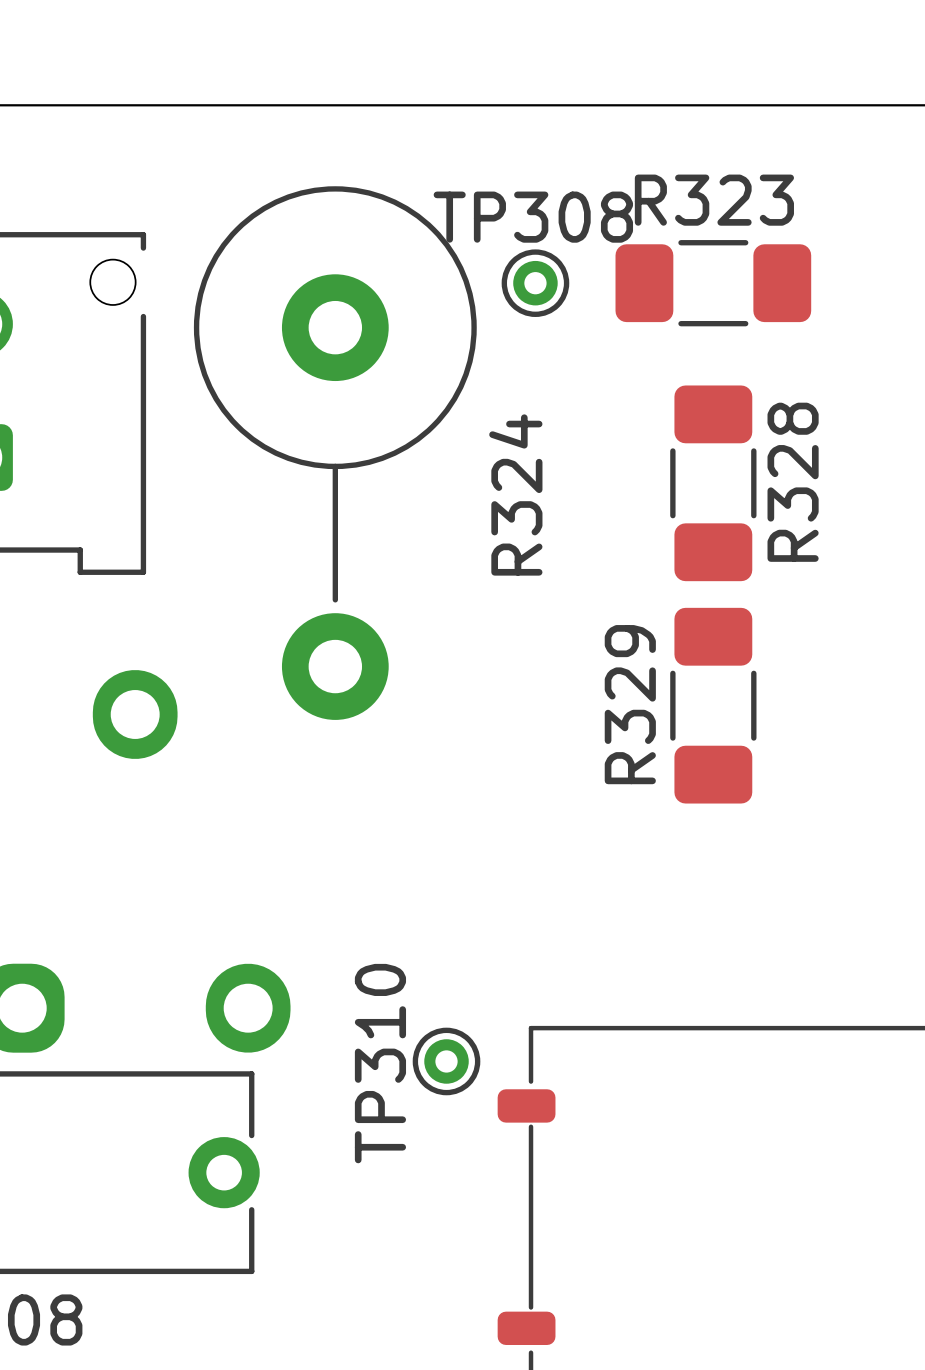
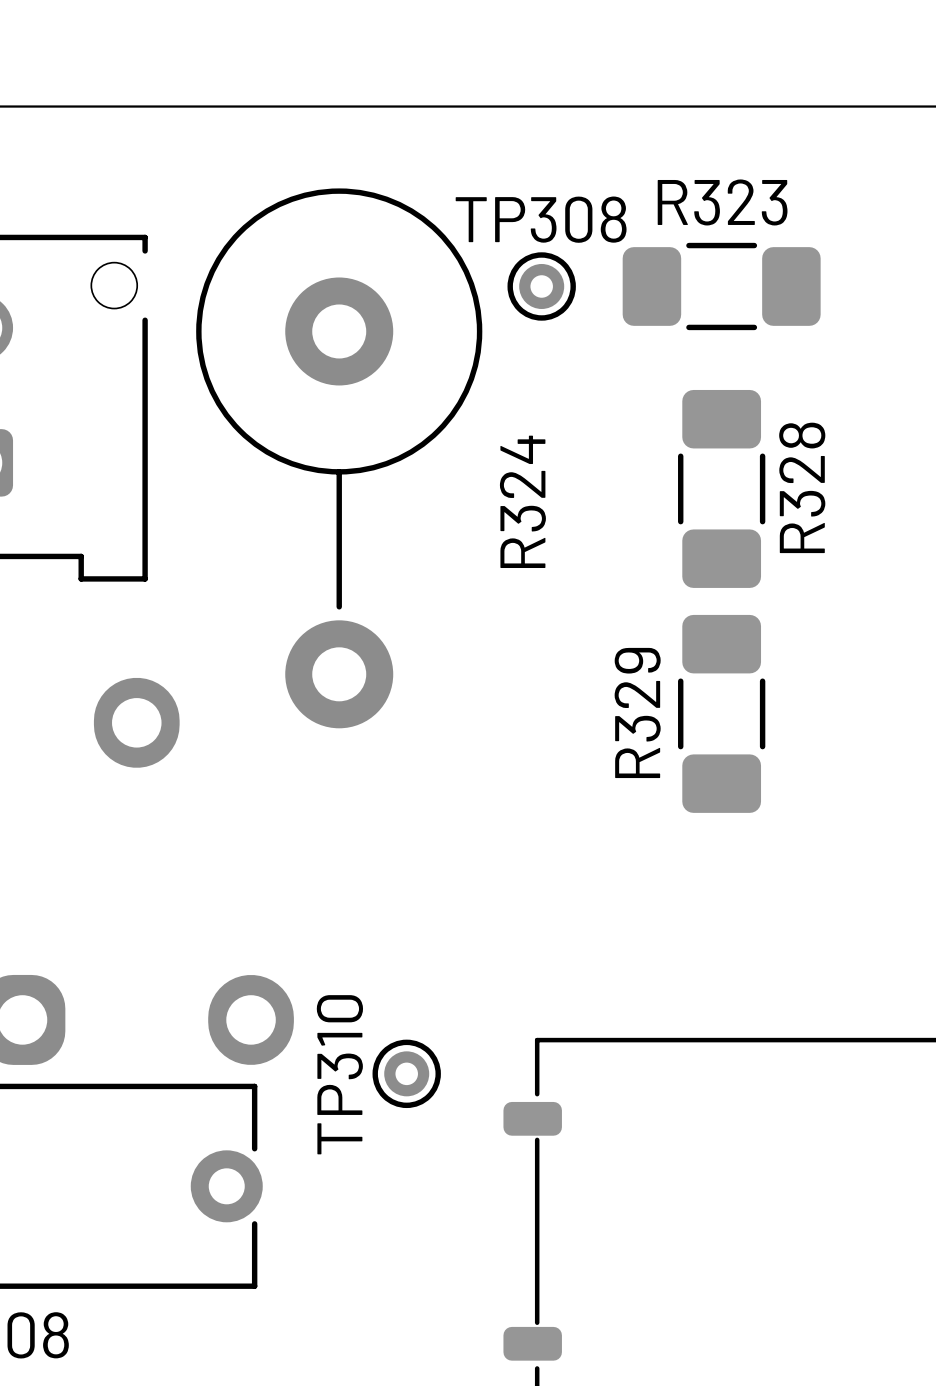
TP310 position: (446, 1061) -> (406, 1073)

